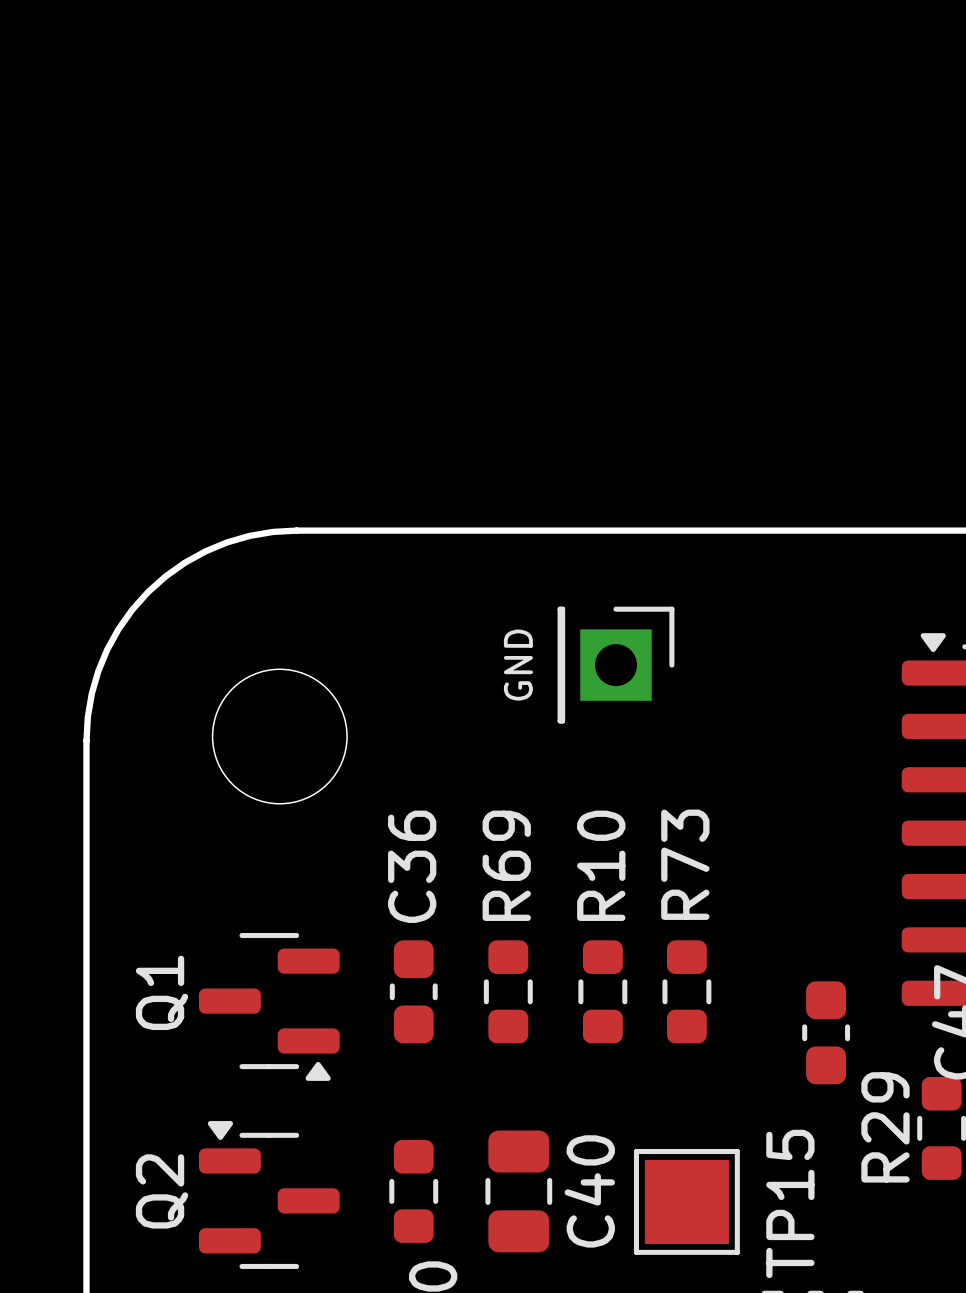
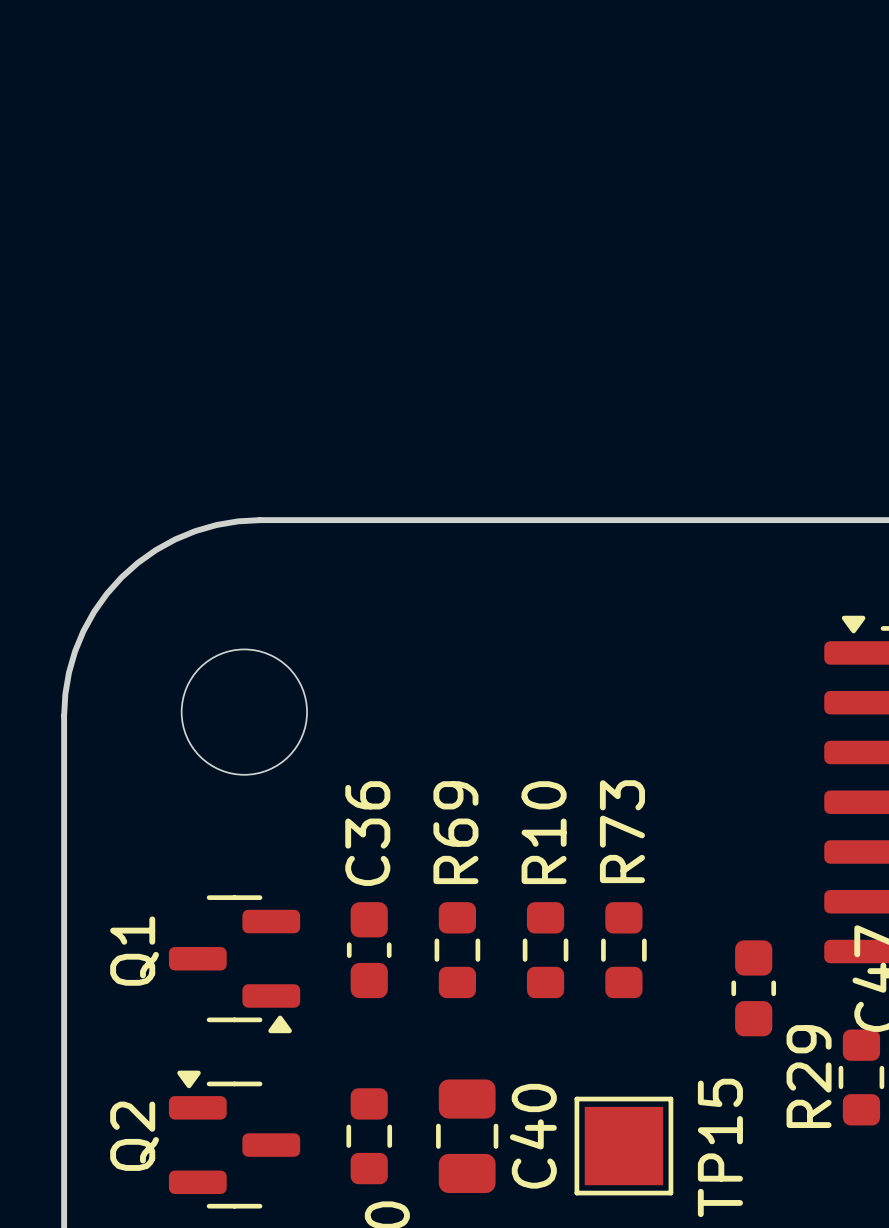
text: GND (518, 665) -> none
part: (616, 665) -> none

